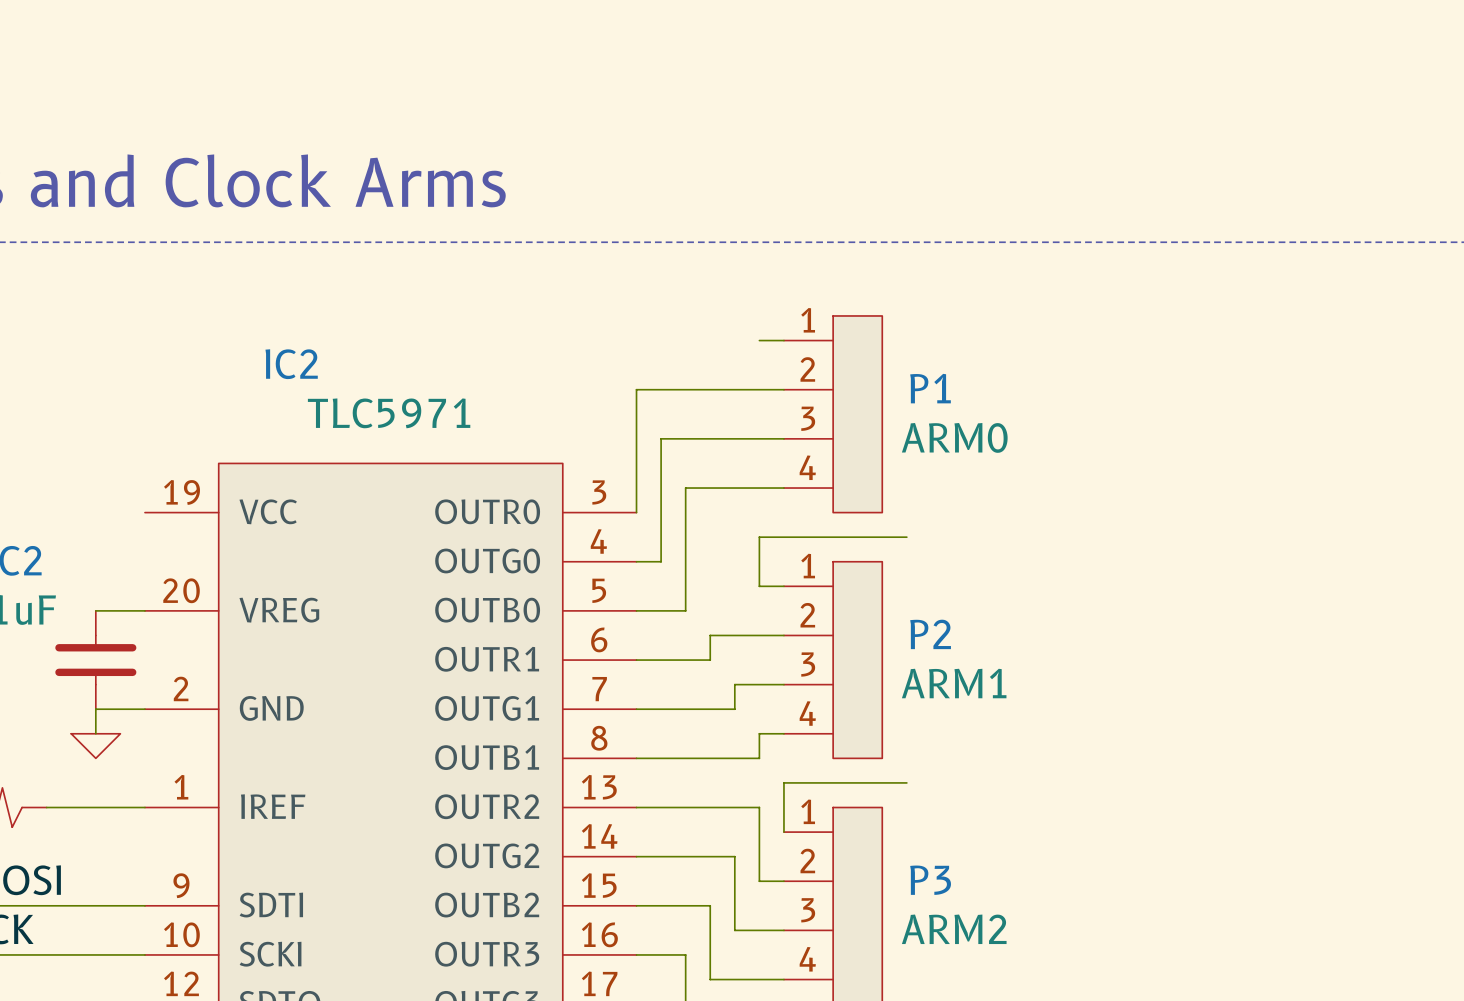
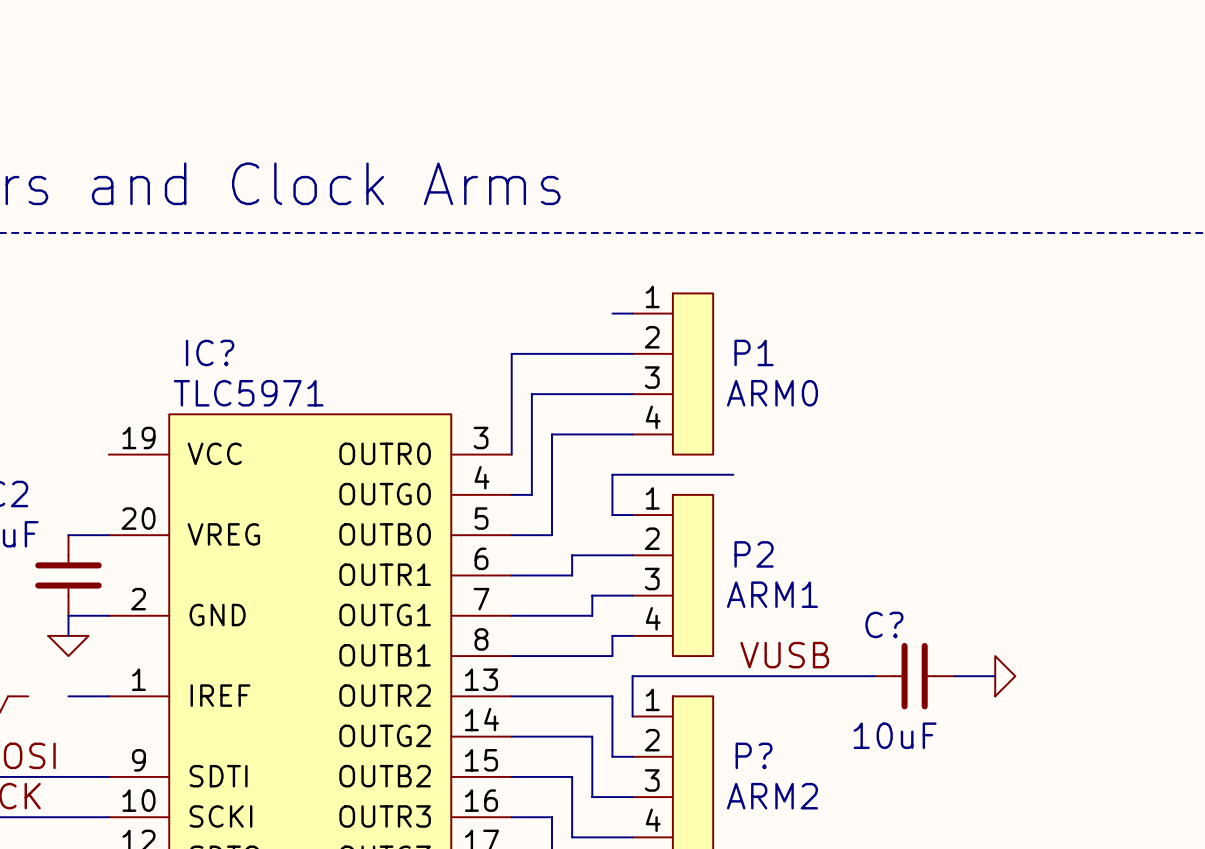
IC2 name: IC2 (291, 364) -> IC? (210, 352)
IC2 value position: TLC5971 (389, 413) -> TLC5971 (248, 393)
label: none -> VUSB (784, 655)
wire: none -> (733, 676) (874, 676)
C?: none -> 10uF (914, 676)
wire: none -> (954, 676) (995, 676)
power symbol: none -> (1005, 676)
wire: (46, 807) (95, 807) -> none
P3 name: P3 (930, 880) -> P? (754, 755)

